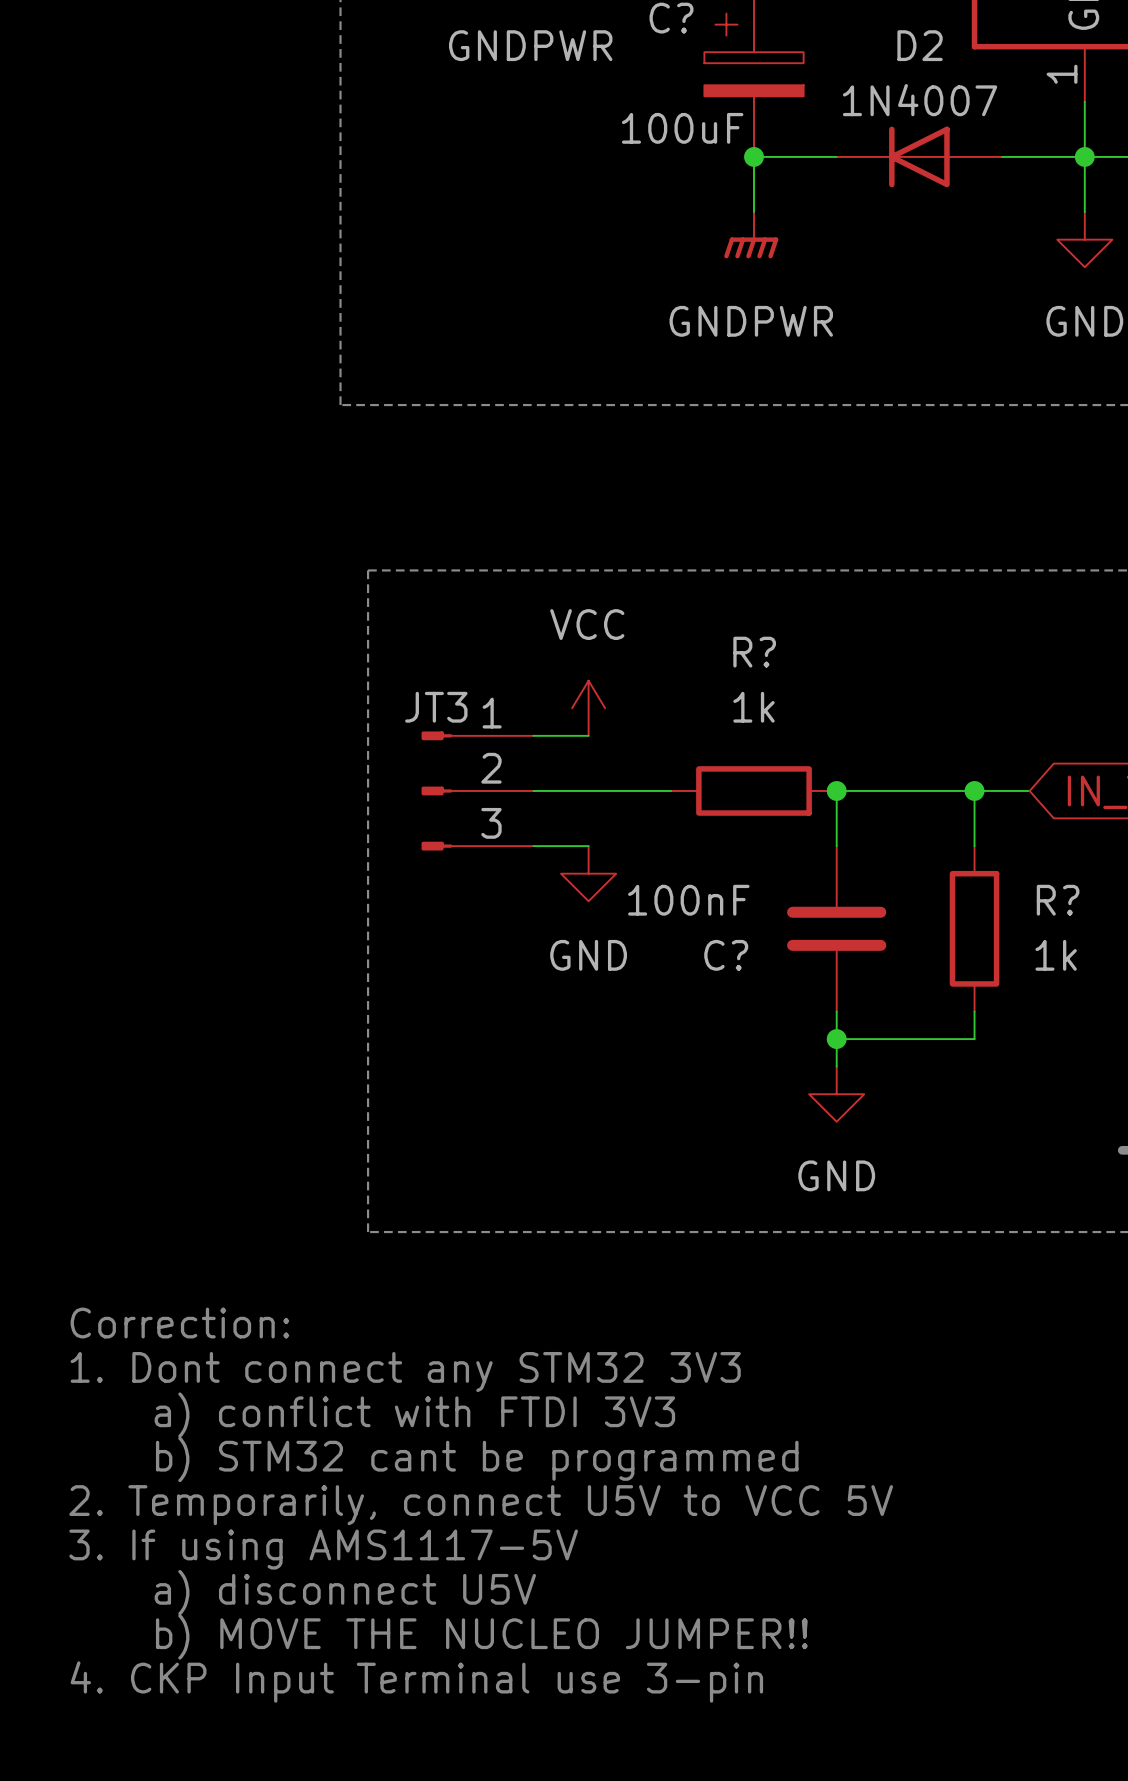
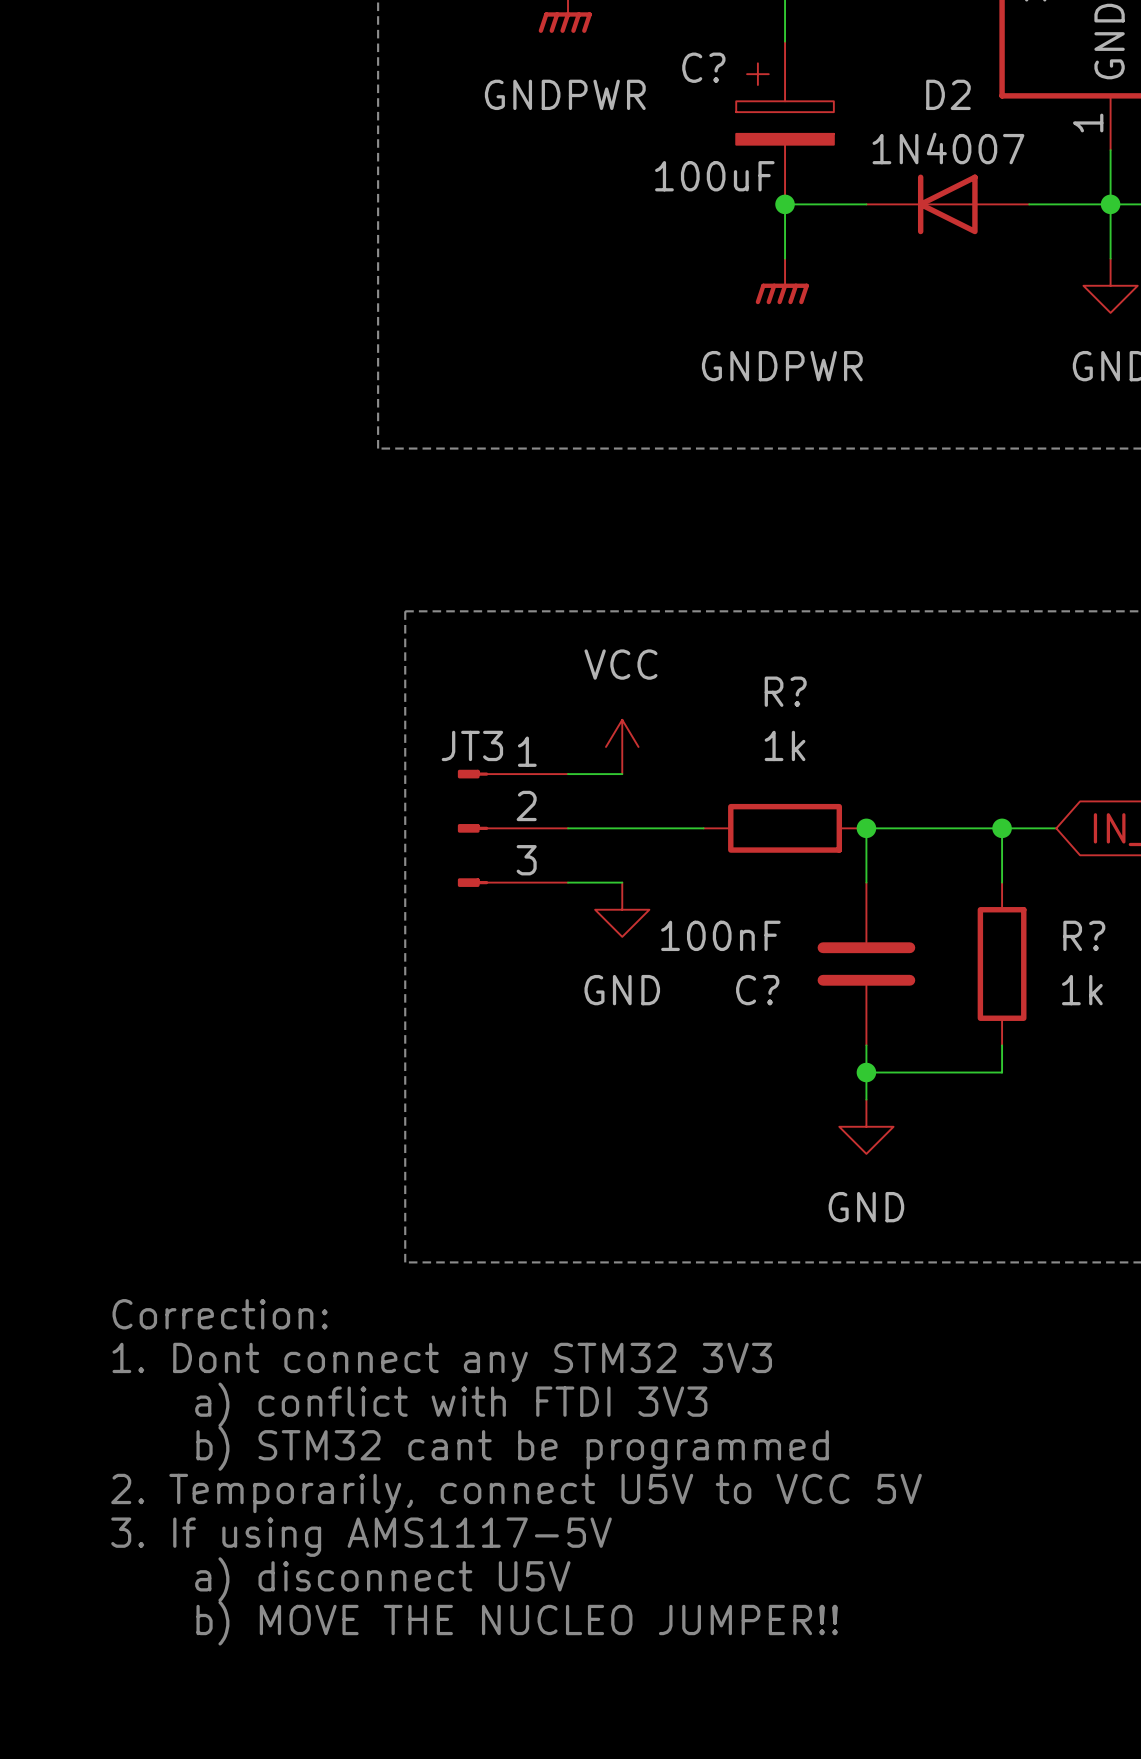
text position: Correction: (179, 1323) -> Correction: (220, 1314)
text position: 1. Dont connect any STM32 3V3 (405, 1372) -> 1. Dont connect any STM32 3V3 (442, 1362)
text position: a) conflict with FTDI 3V3 (414, 1415) -> a) conflict with FTDI 3V3 (451, 1404)
text position: b) STM32 cant be programmed (477, 1459) -> b) STM32 cant be programmed (512, 1448)
text position: 2. Temporarily, connect U5V to VCC 5V (481, 1505) -> 2. Temporarily, connect U5V to VCC 5V (516, 1493)
text position: 3. If using AMS1117-5V (323, 1549) -> 3. If using AMS1117-5V (361, 1537)
text position: a) disconnect U5V (345, 1592) -> a) disconnect U5V (382, 1579)
text position: b) MOVE THE NUCLEO JUMPER!! (481, 1636) -> b) MOVE THE NUCLEO JUMPER!! (517, 1623)
text: 4. CKP Input Terminal use 3-pin (416, 1682) -> none

